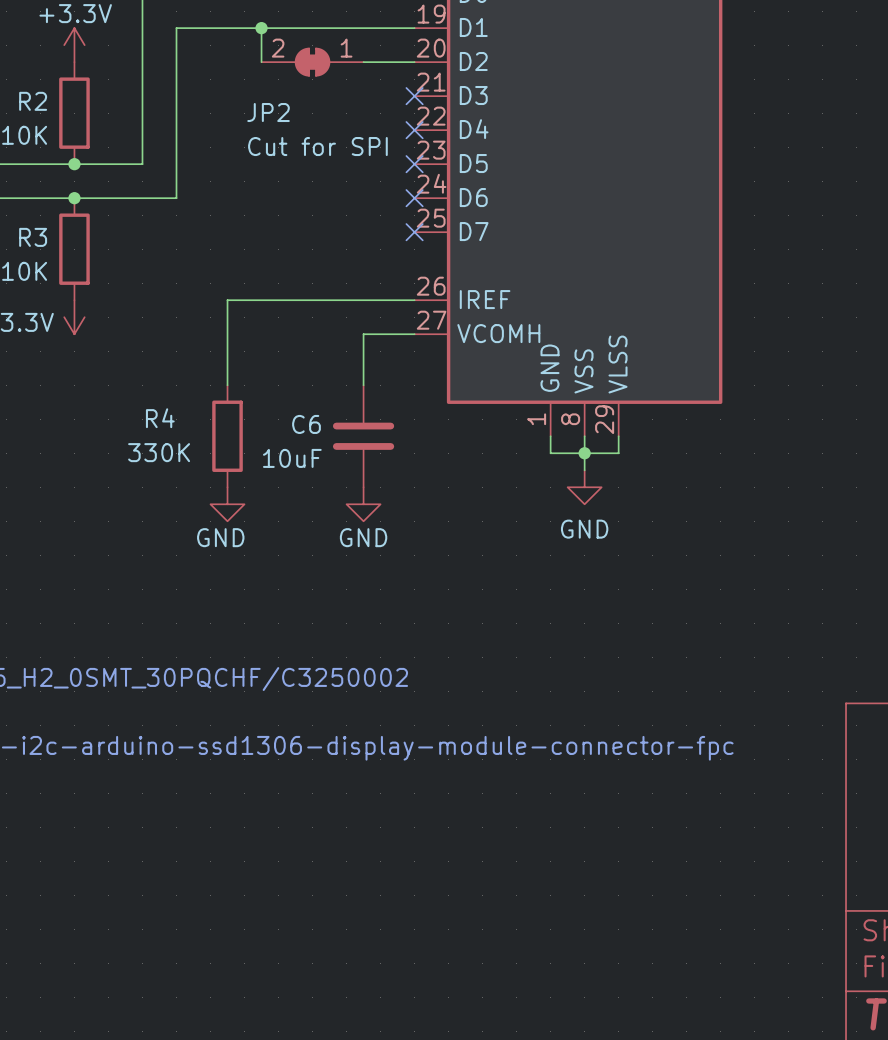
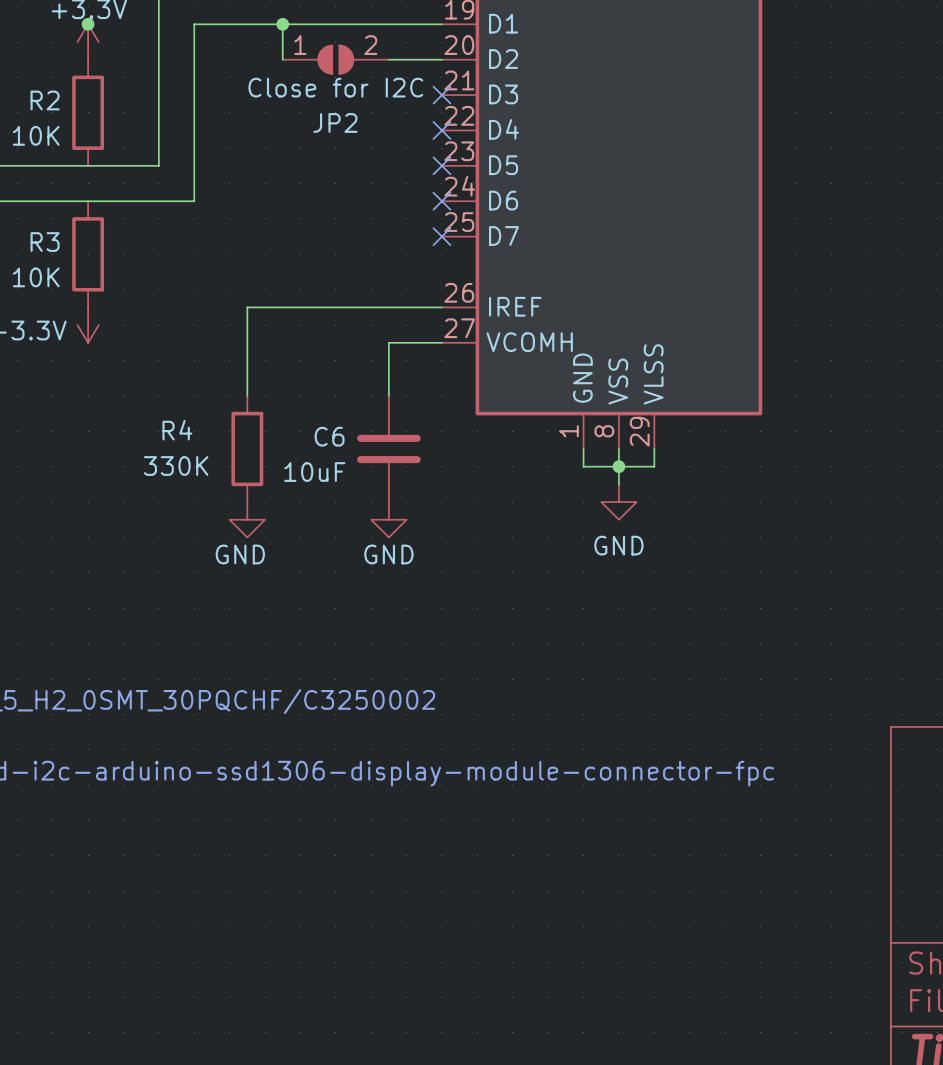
junction: none -> (88, 24)
JP2 symbol: [261, 48, 364, 76] -> [282, 45, 389, 74]
JP2 name position: JP2 (268, 112) -> JP2 (335, 122)
JP2 value: Cut for SPI (317, 146) -> Close for I2C (335, 87)
junction: (74, 164) -> none
junction: (74, 198) -> none

